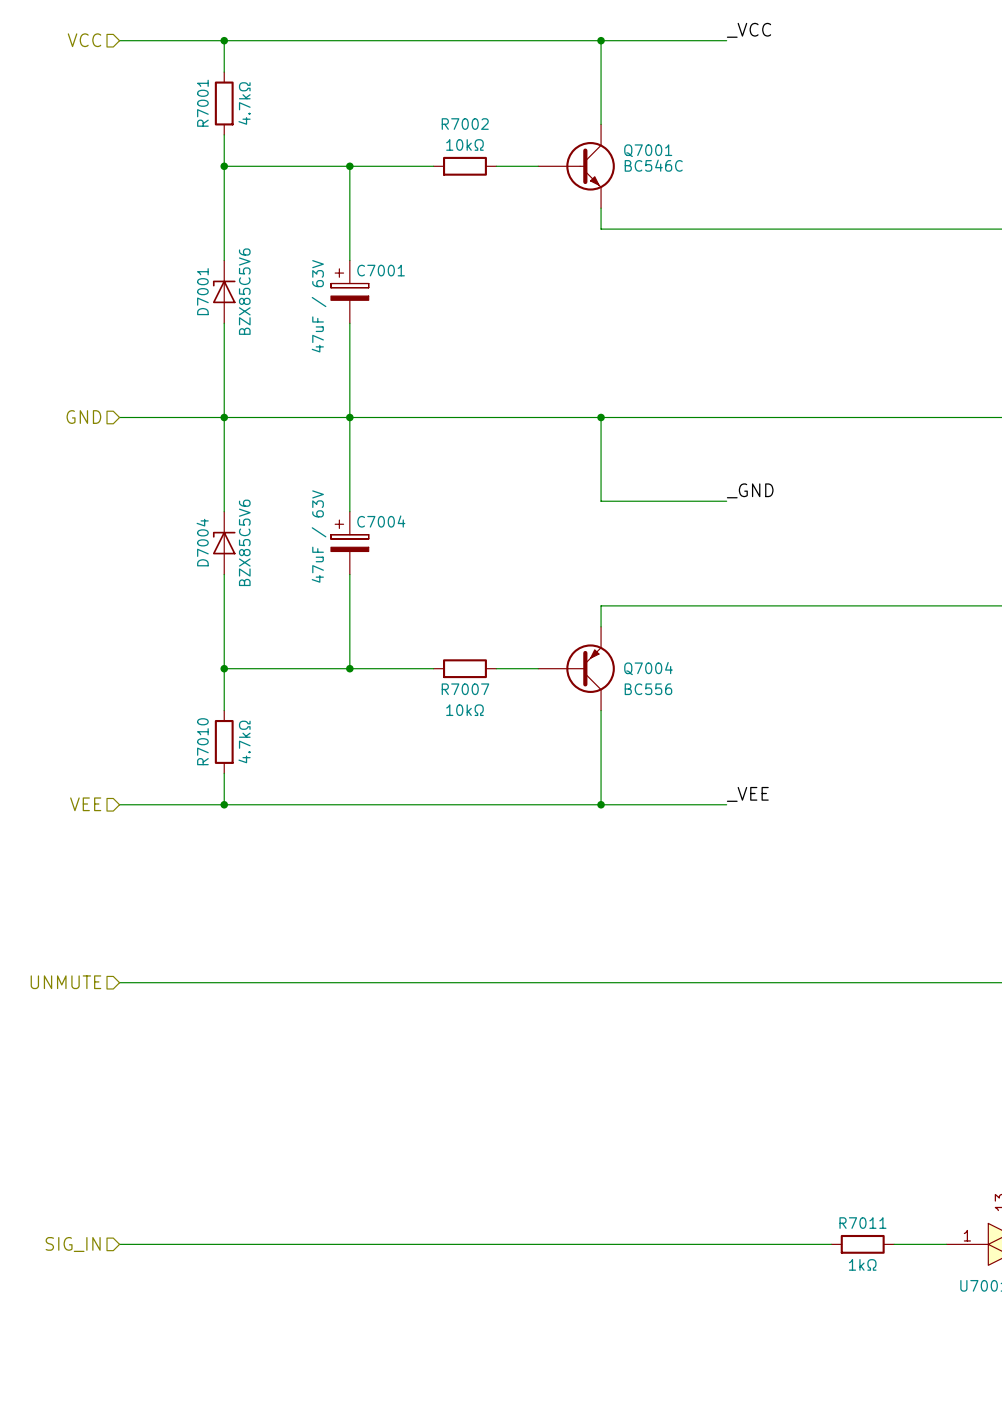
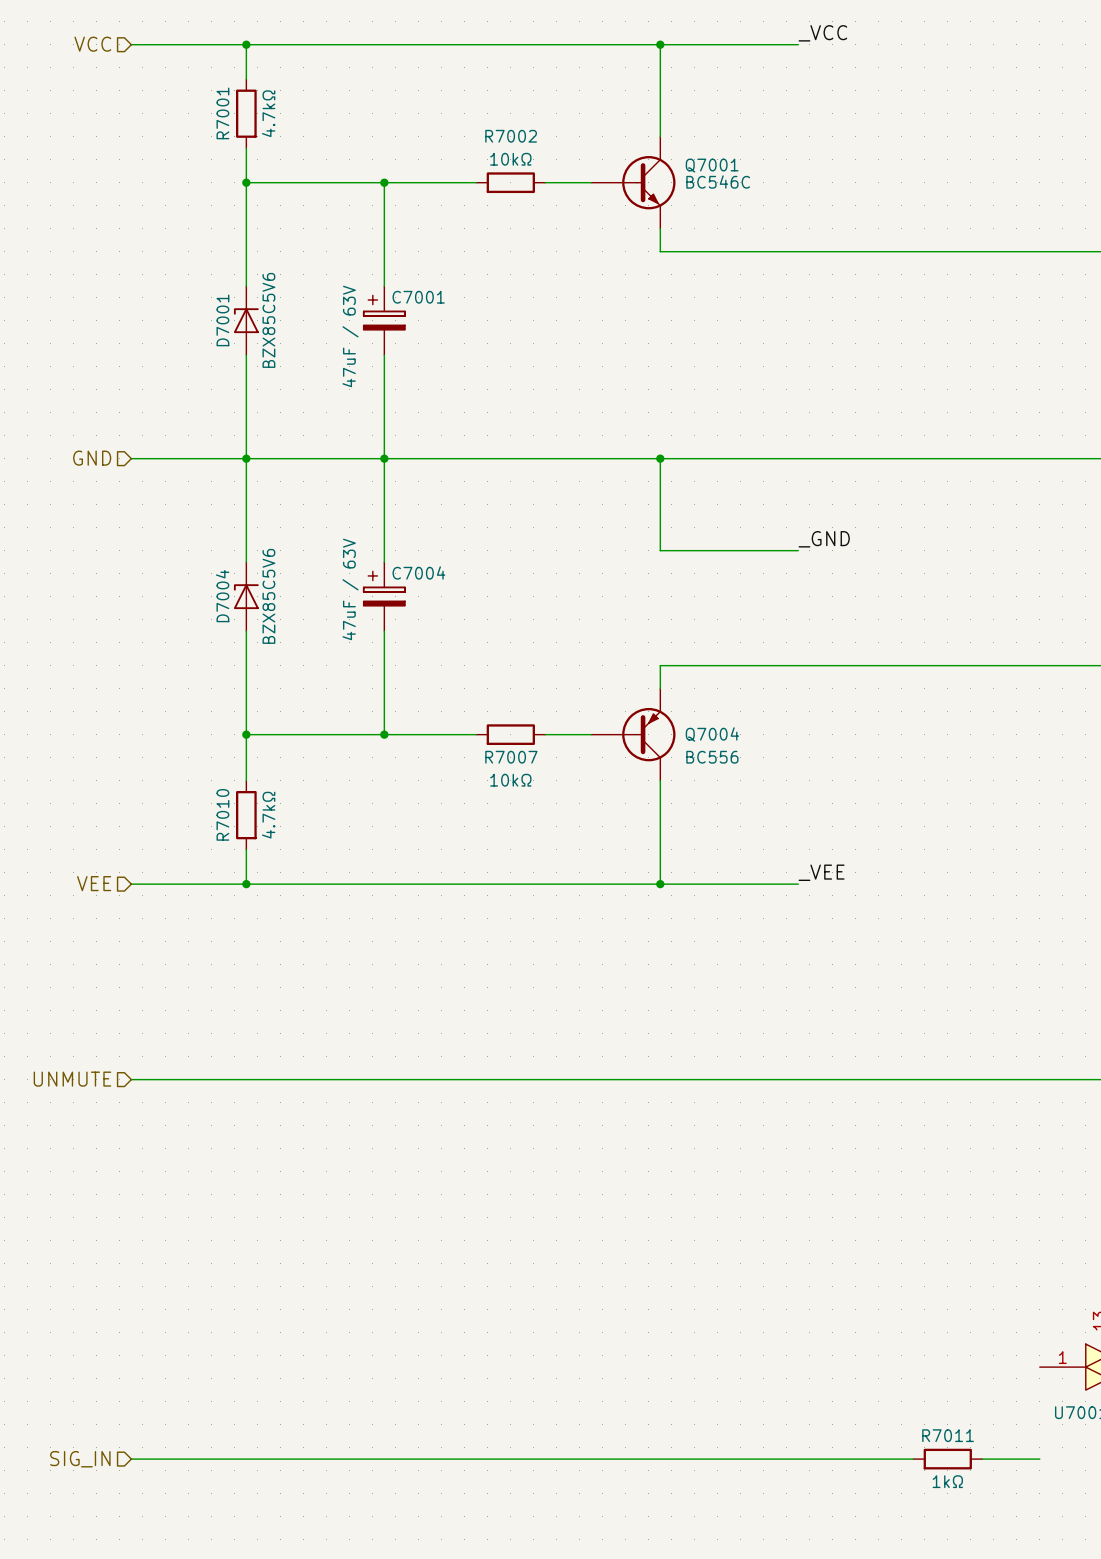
hierarchical label position: SIG_IN (73, 1244) -> SIG_IN (80, 1459)
wire: (119, 1244) (831, 1244) -> (131, 1459) (913, 1459)
R7011 position: (862, 1244) -> (947, 1459)
wire: (894, 1244) (946, 1244) -> (982, 1459) (1039, 1459)

